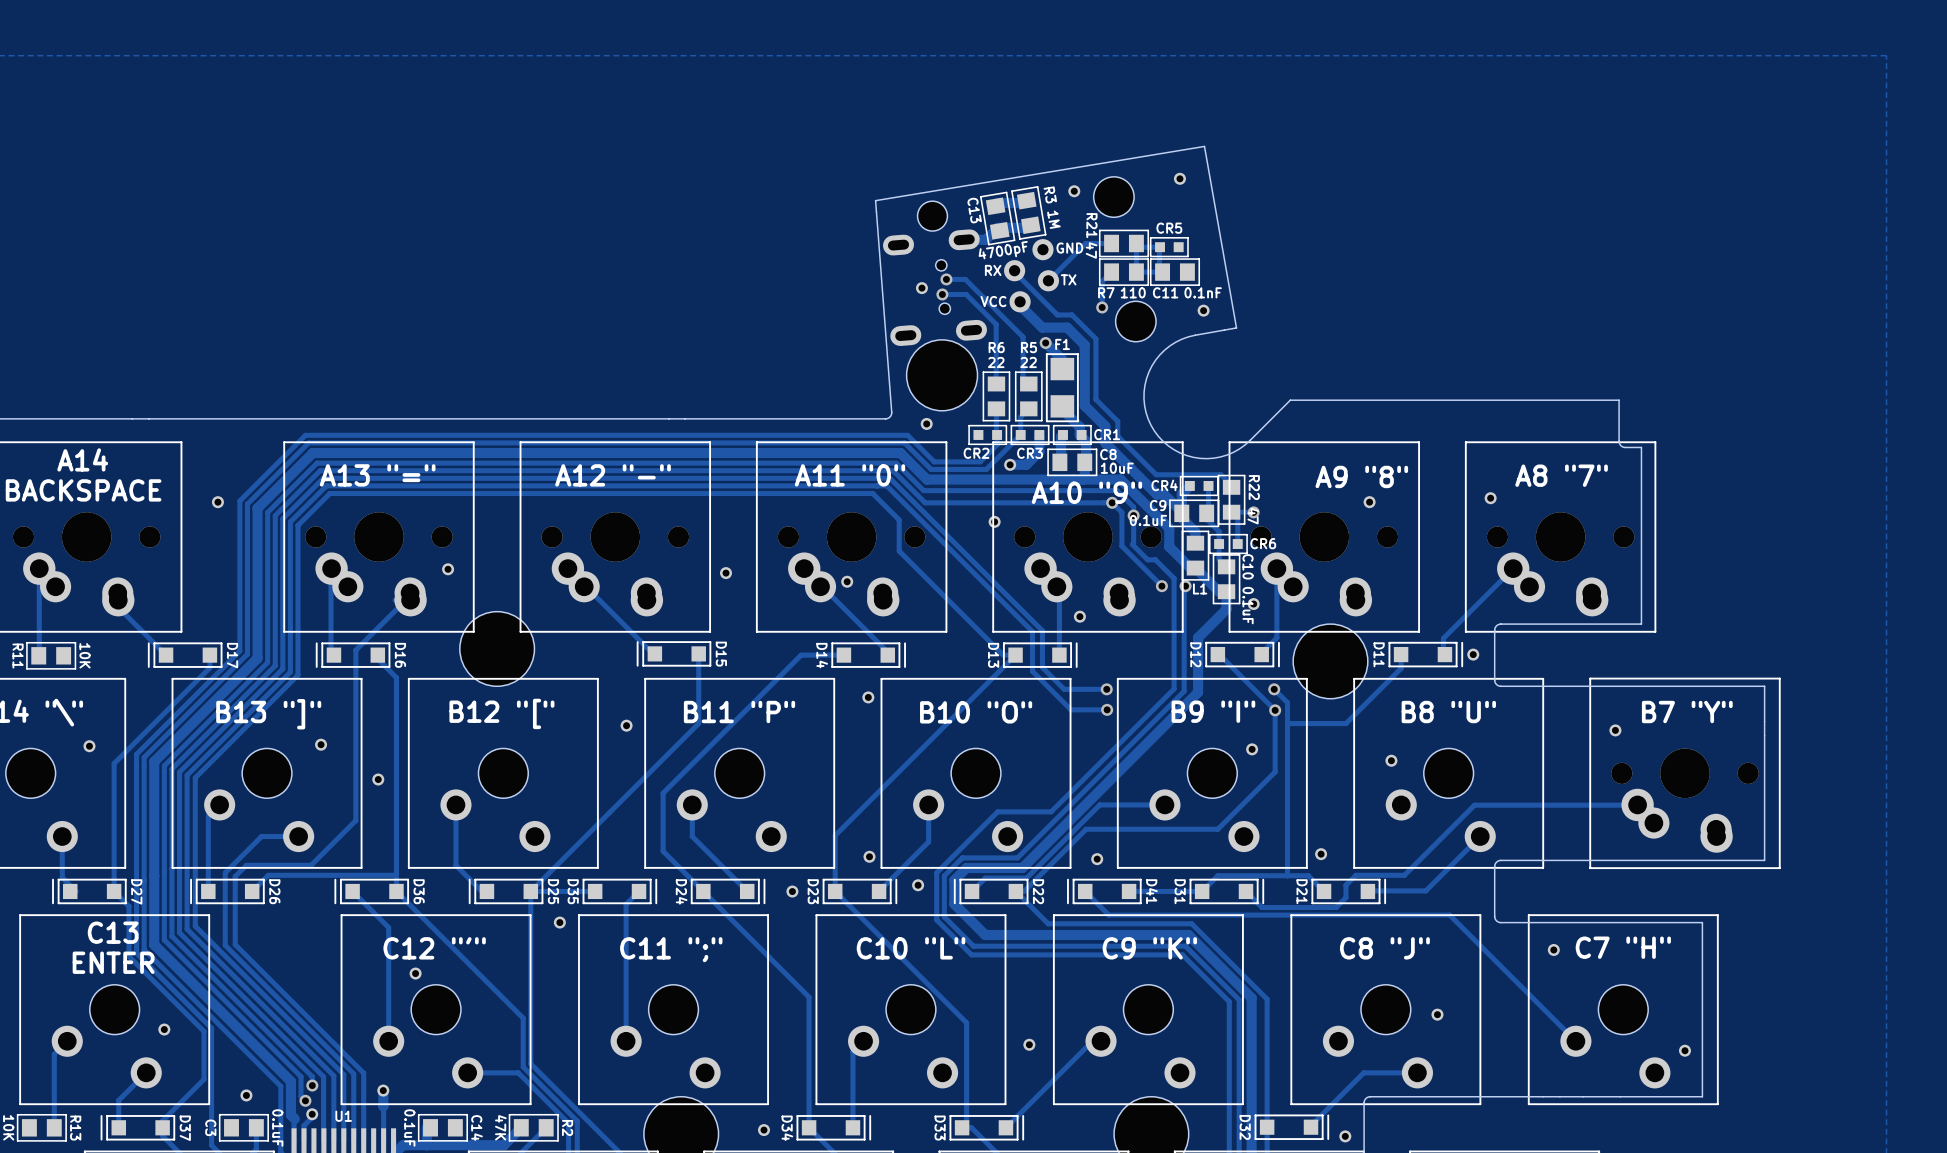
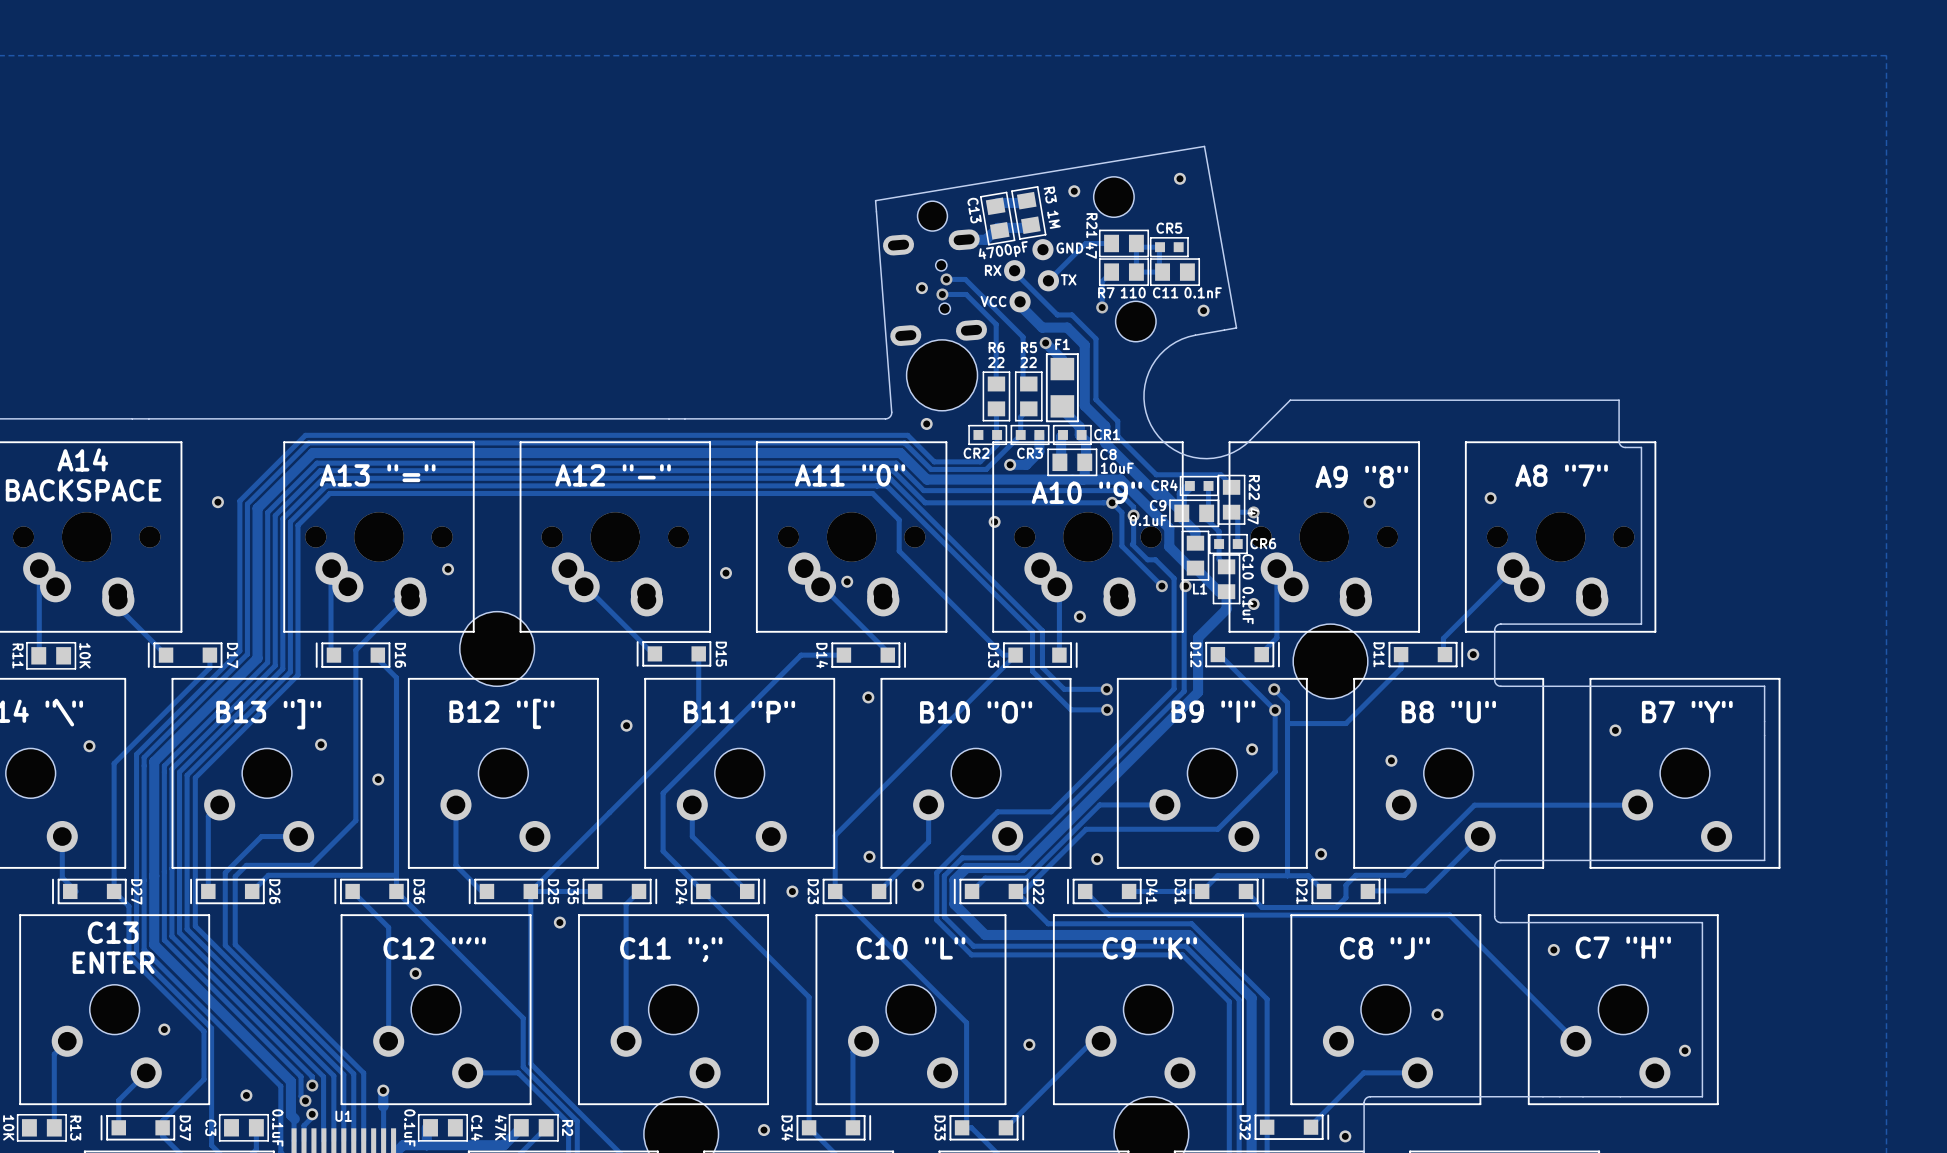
part footprint: [1589, 677, 1781, 870] -> [1589, 677, 1781, 869]

